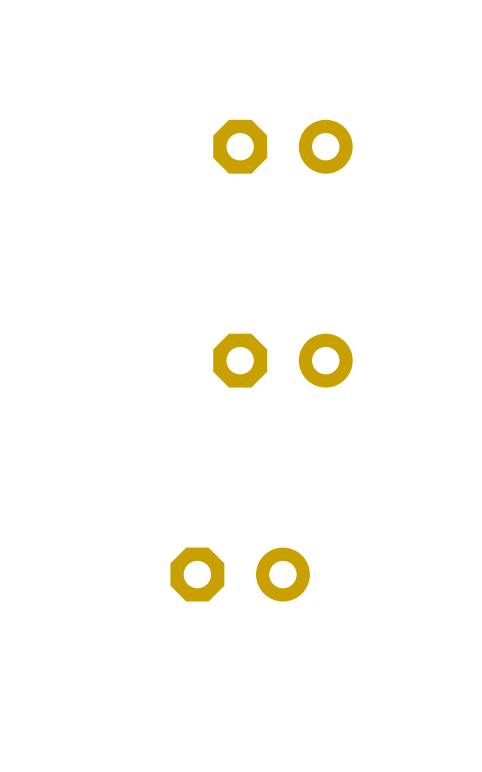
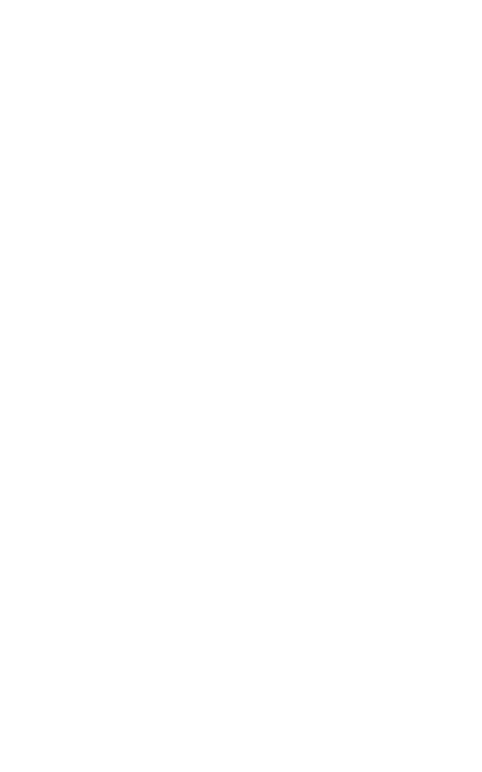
part: (282, 146) -> none
part: (282, 360) -> none
part: (240, 574) -> none

